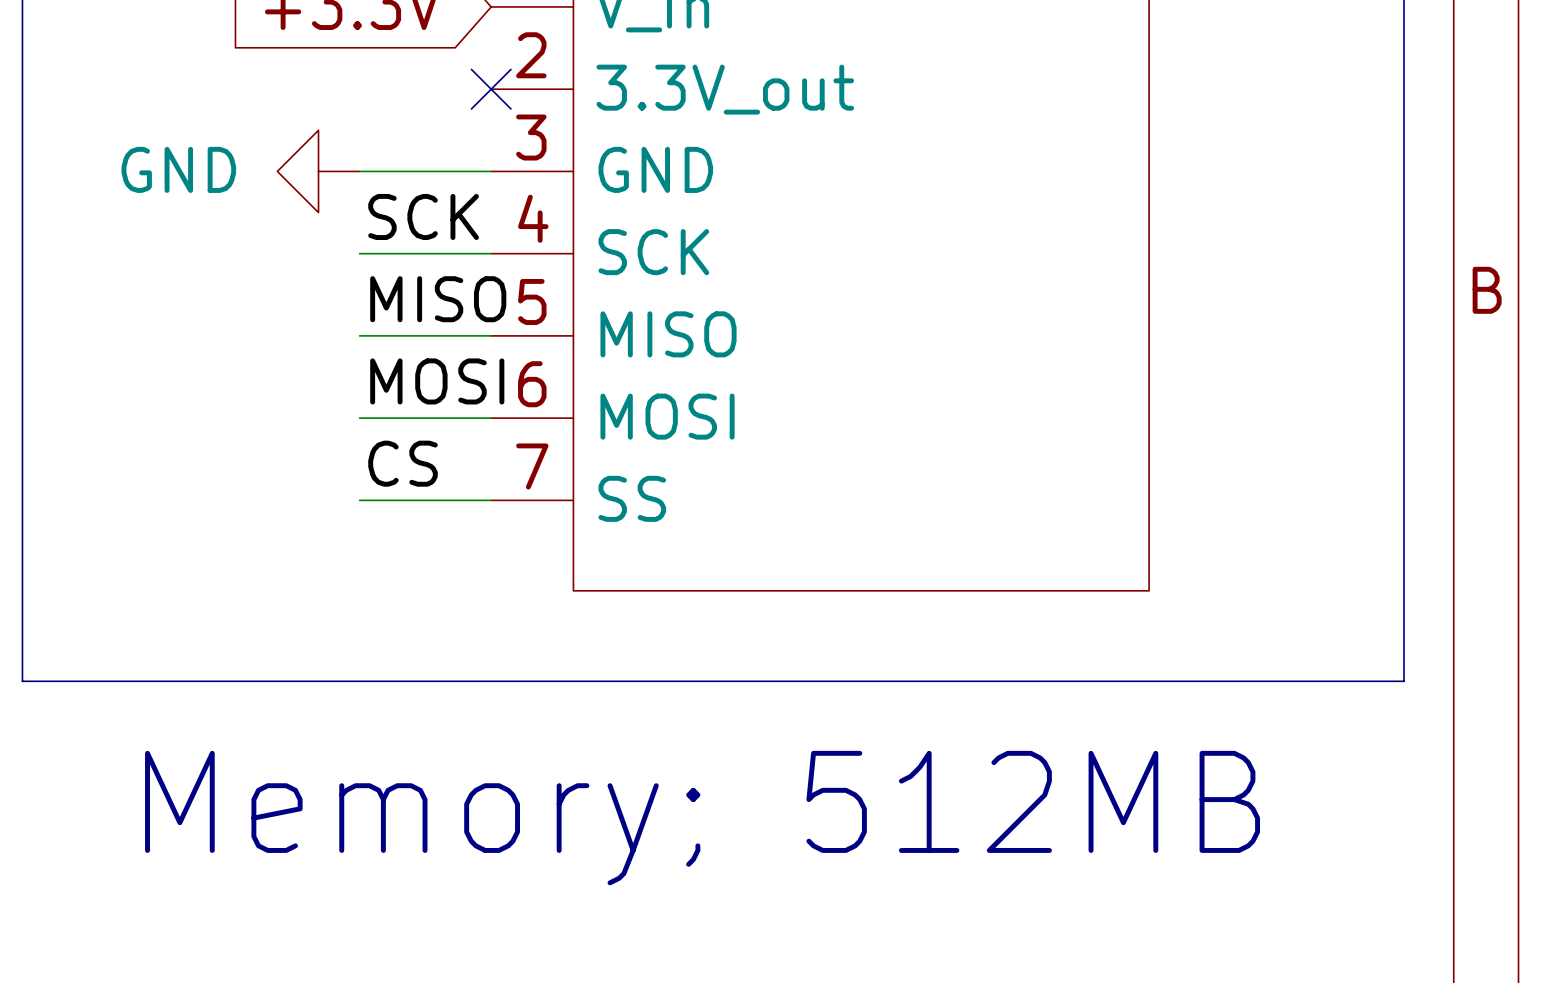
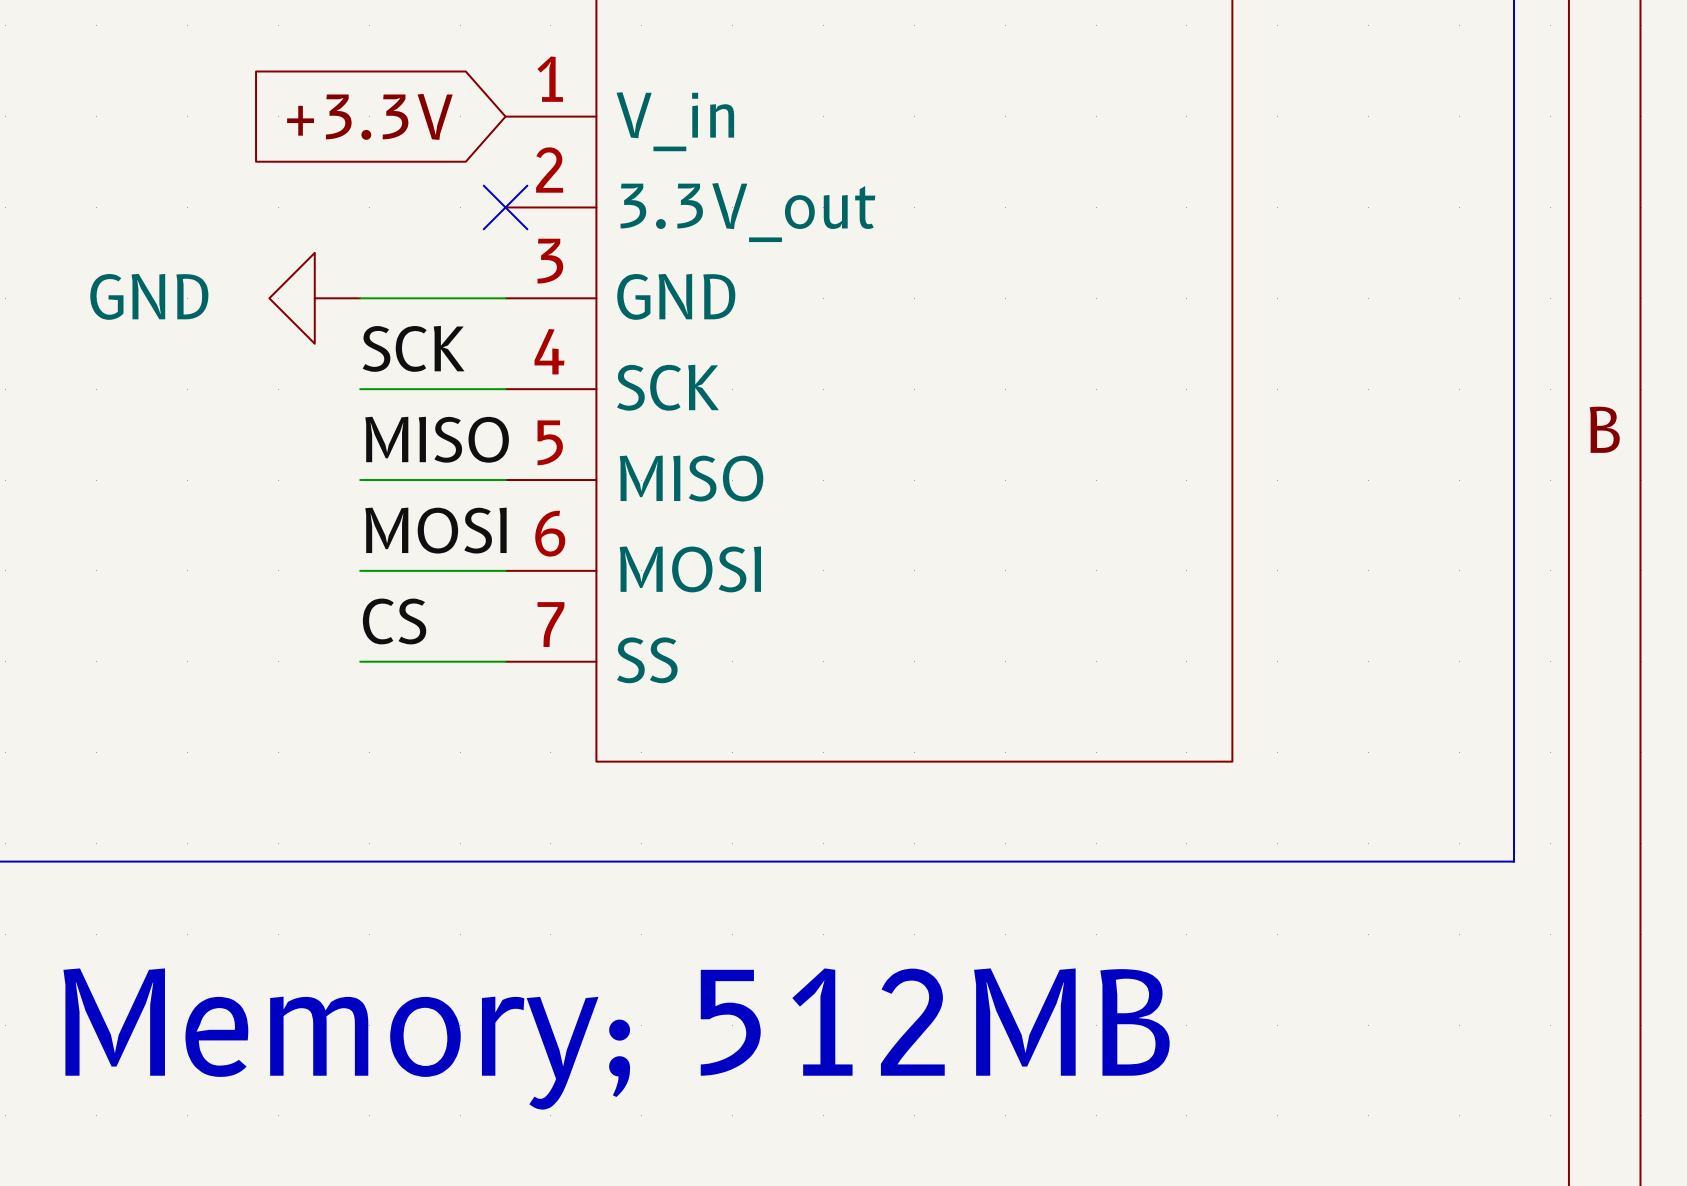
text position: Memory; 512MB (702, 818) -> Memory; 512MB (616, 1039)

